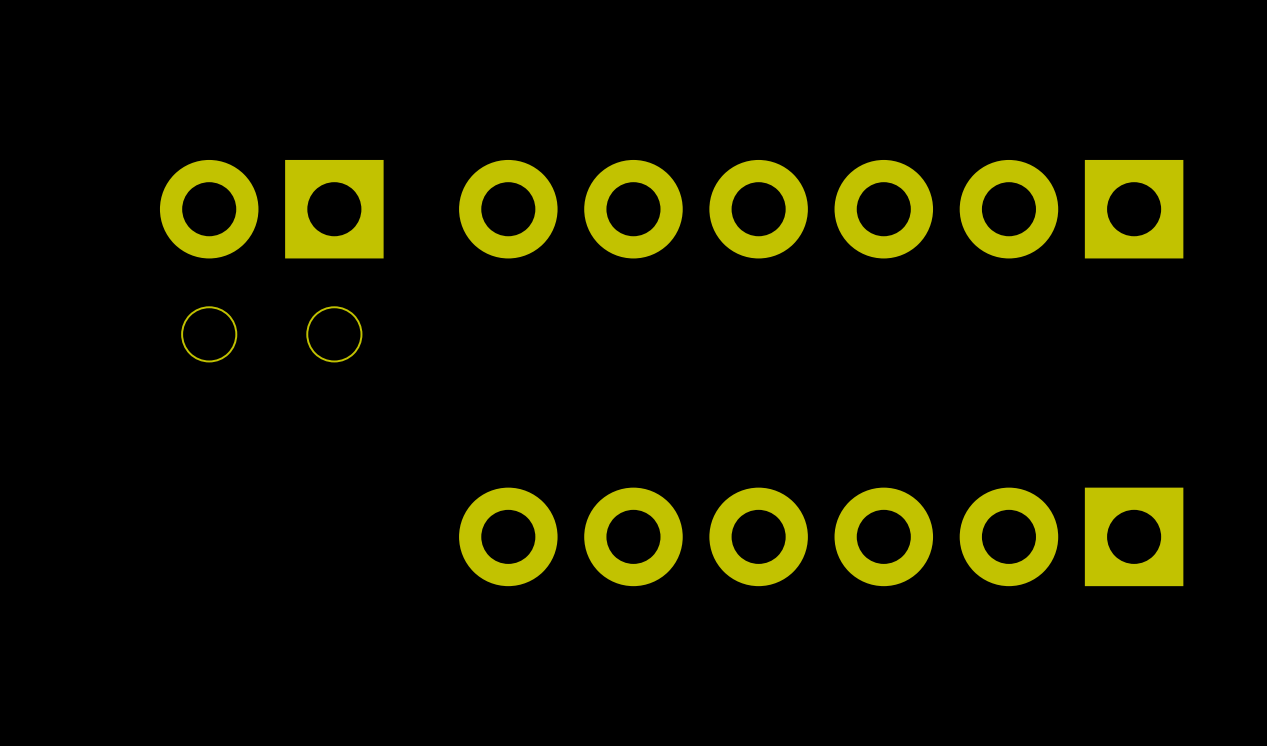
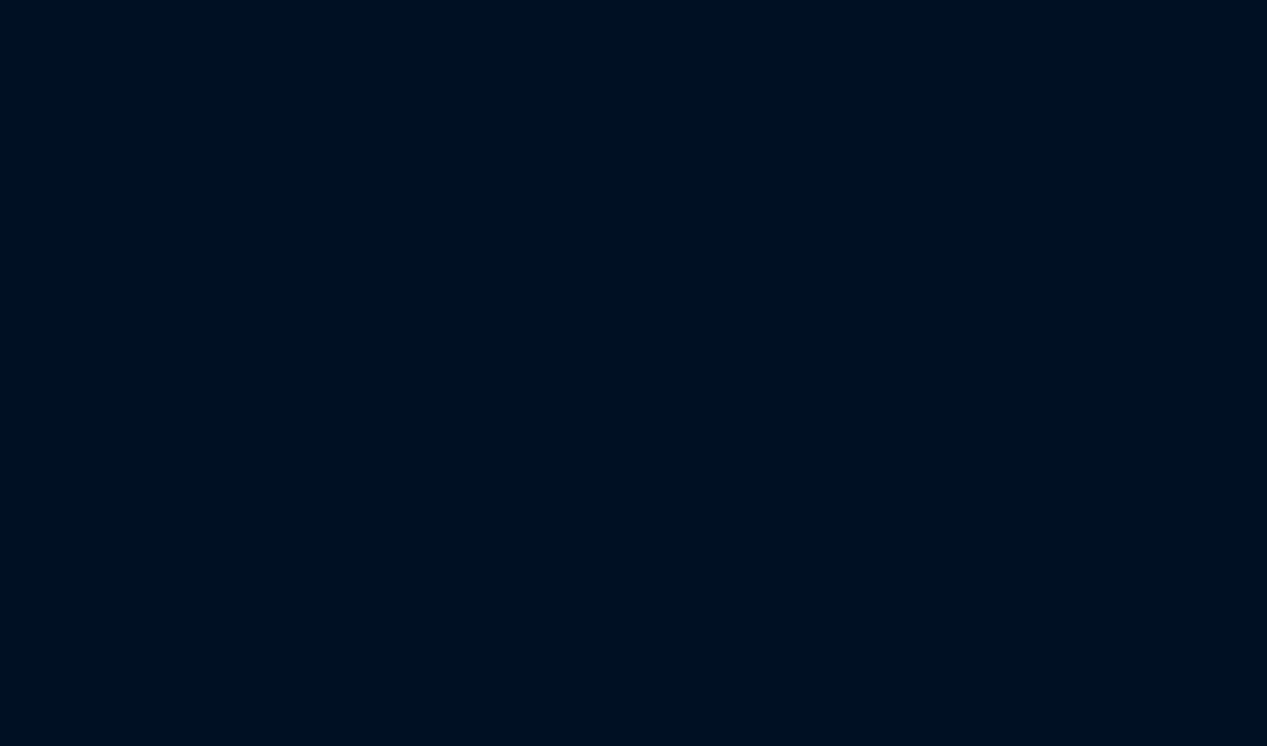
part: (821, 209) -> none
part: (271, 260) -> none
part: (821, 536) -> none

